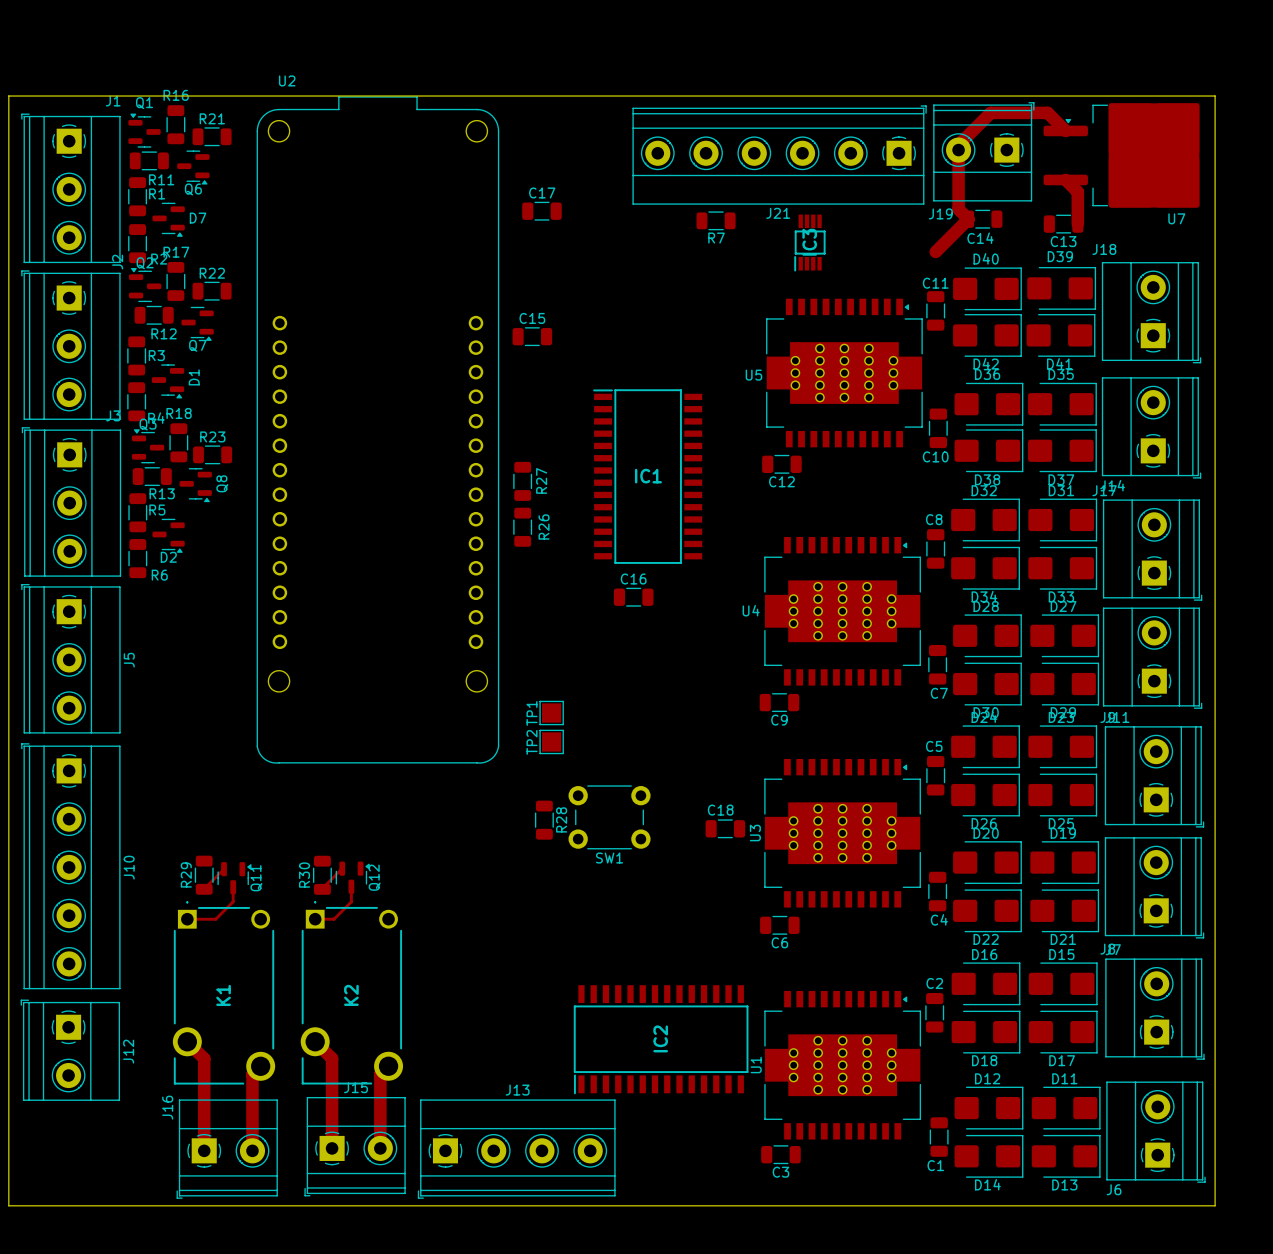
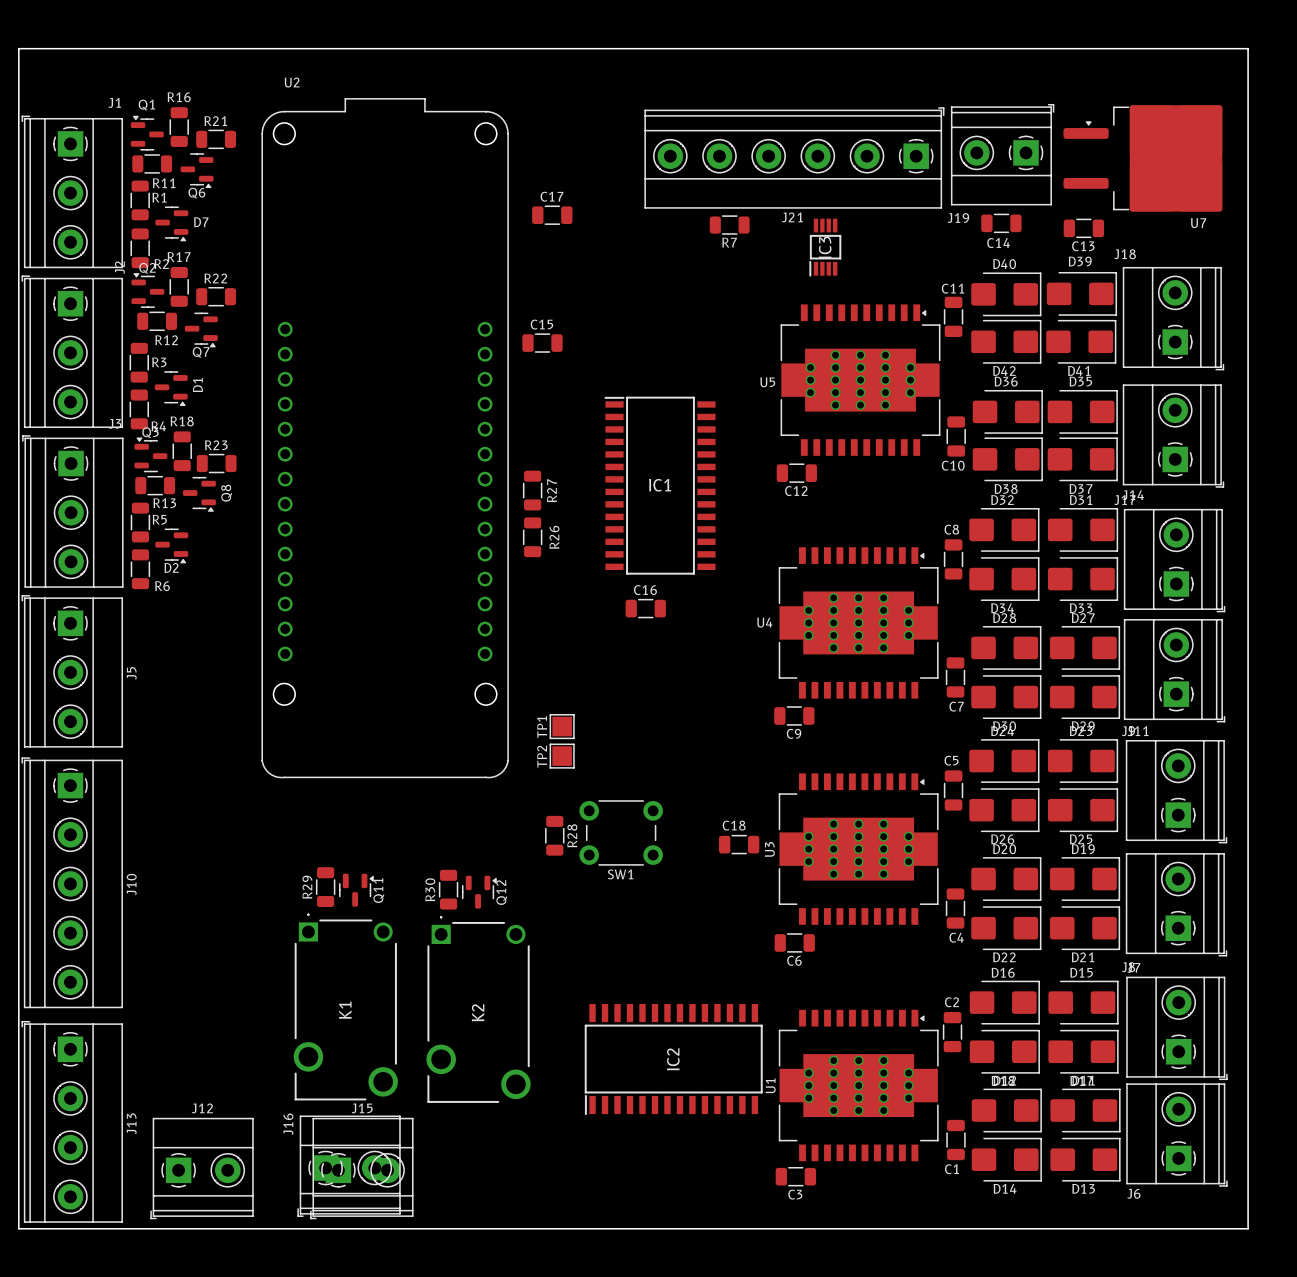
track: (1065, 130) (1047, 112) (990, 112) (958, 145) (958, 209) (968, 219) (935, 251) -> none
track: (1065, 179) (1077, 192) (1077, 224) -> none
track: (342, 868) (322, 889) -> none
track: (224, 869) (204, 889) -> none
R29 position: (204, 875) -> (325, 887)
R30 position: (322, 875) -> (448, 889)
Q12 position: (352, 877) -> (479, 892)
Q11 position: (234, 878) -> (356, 890)
track: (351, 886) (351, 901) (334, 919) (315, 919) -> none
track: (233, 887) (233, 901) (215, 919) (187, 919) -> none
K1 position: (224, 992) -> (345, 1007)
K2 position: (351, 992) -> (478, 1009)
track: (187, 1041) (204, 1058) (204, 1150) -> none
track: (315, 1041) (332, 1058) (332, 1148) -> none
J12 rotation: 0° (70, 1050) -> 90° counterclockwise (202, 1168)
J12 position: (70, 1050) -> (202, 1168)
track: (260, 1066) (252, 1074) (252, 1150) -> none
track: (388, 1066) (380, 1074) (380, 1148) -> none
D12 position: (988, 1108) -> (1006, 1110)
D11 position: (1066, 1108) -> (1085, 1110)
J6 position: (1155, 1132) -> (1176, 1135)
C1 position: (939, 1137) -> (955, 1140)
J16 position: (227, 1149) -> (349, 1166)
J13 rotation: 0° (516, 1149) -> 90° clockwise (72, 1121)
J13 position: (516, 1149) -> (72, 1121)
D14 position: (988, 1156) -> (1006, 1159)
D13 position: (1066, 1156) -> (1085, 1159)
board edge: (18, 1205) (8, 1205) (8, 96) (1215, 96) (1215, 1205) -> (18, 1228) (18, 48) (1248, 48) (1248, 1228) (1238, 1228)

